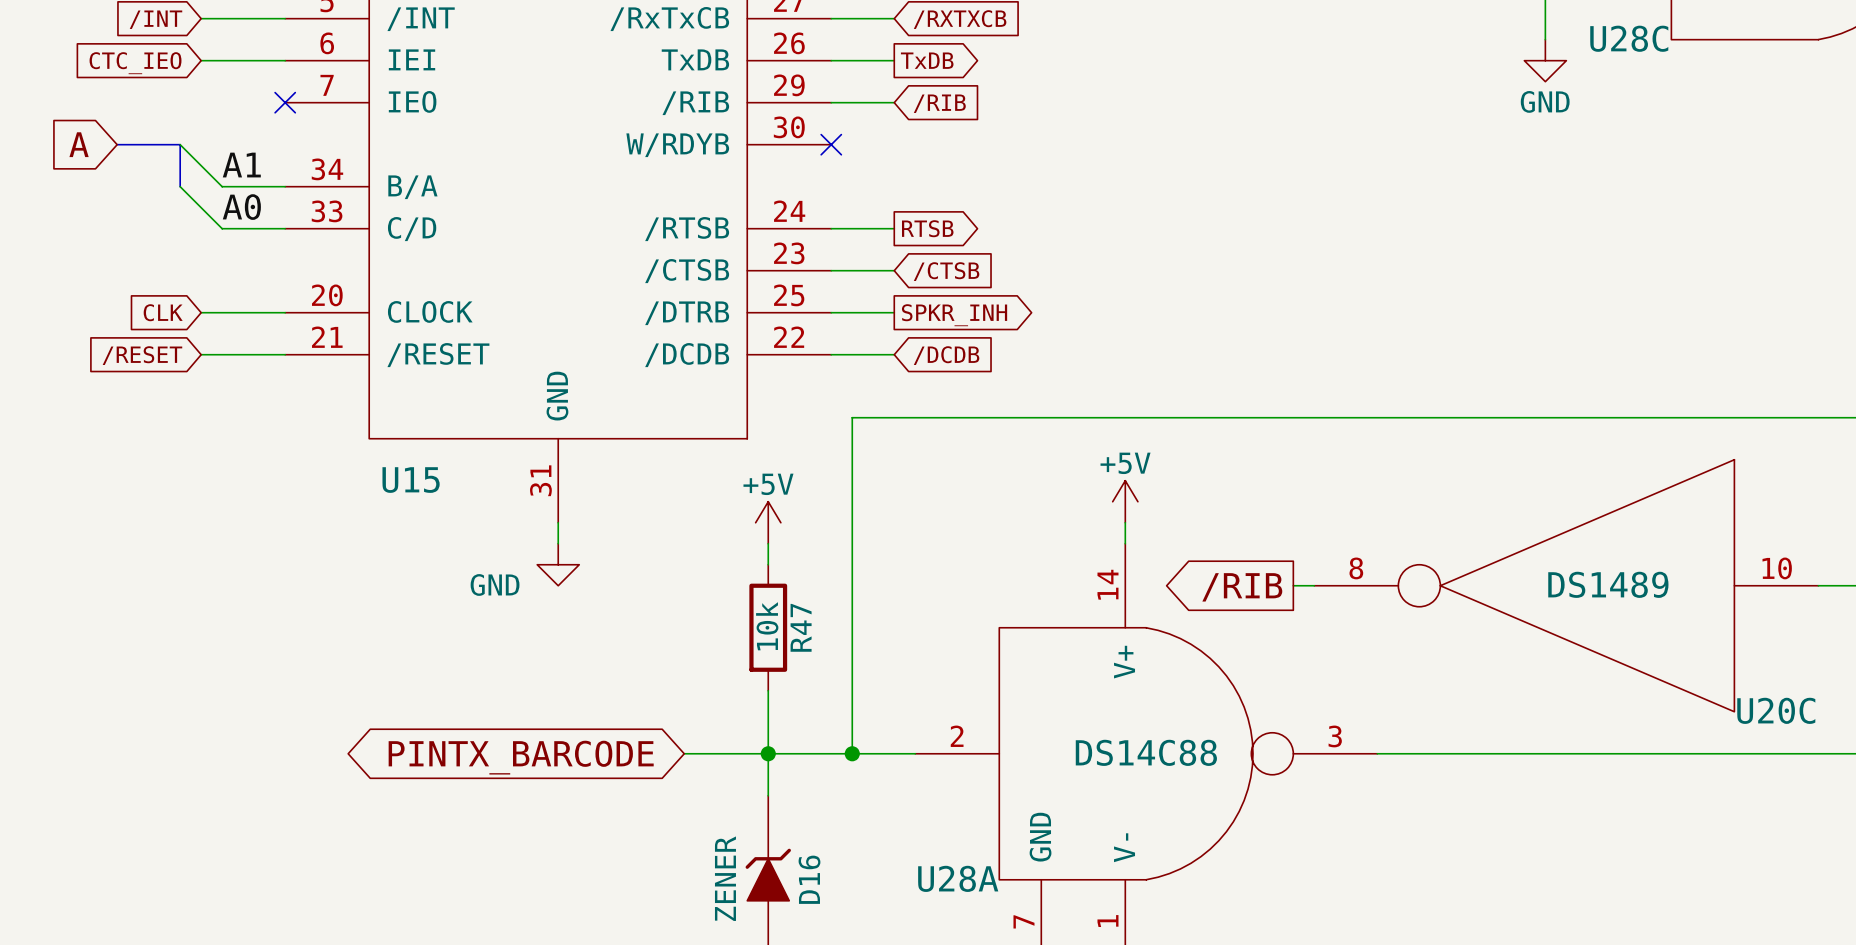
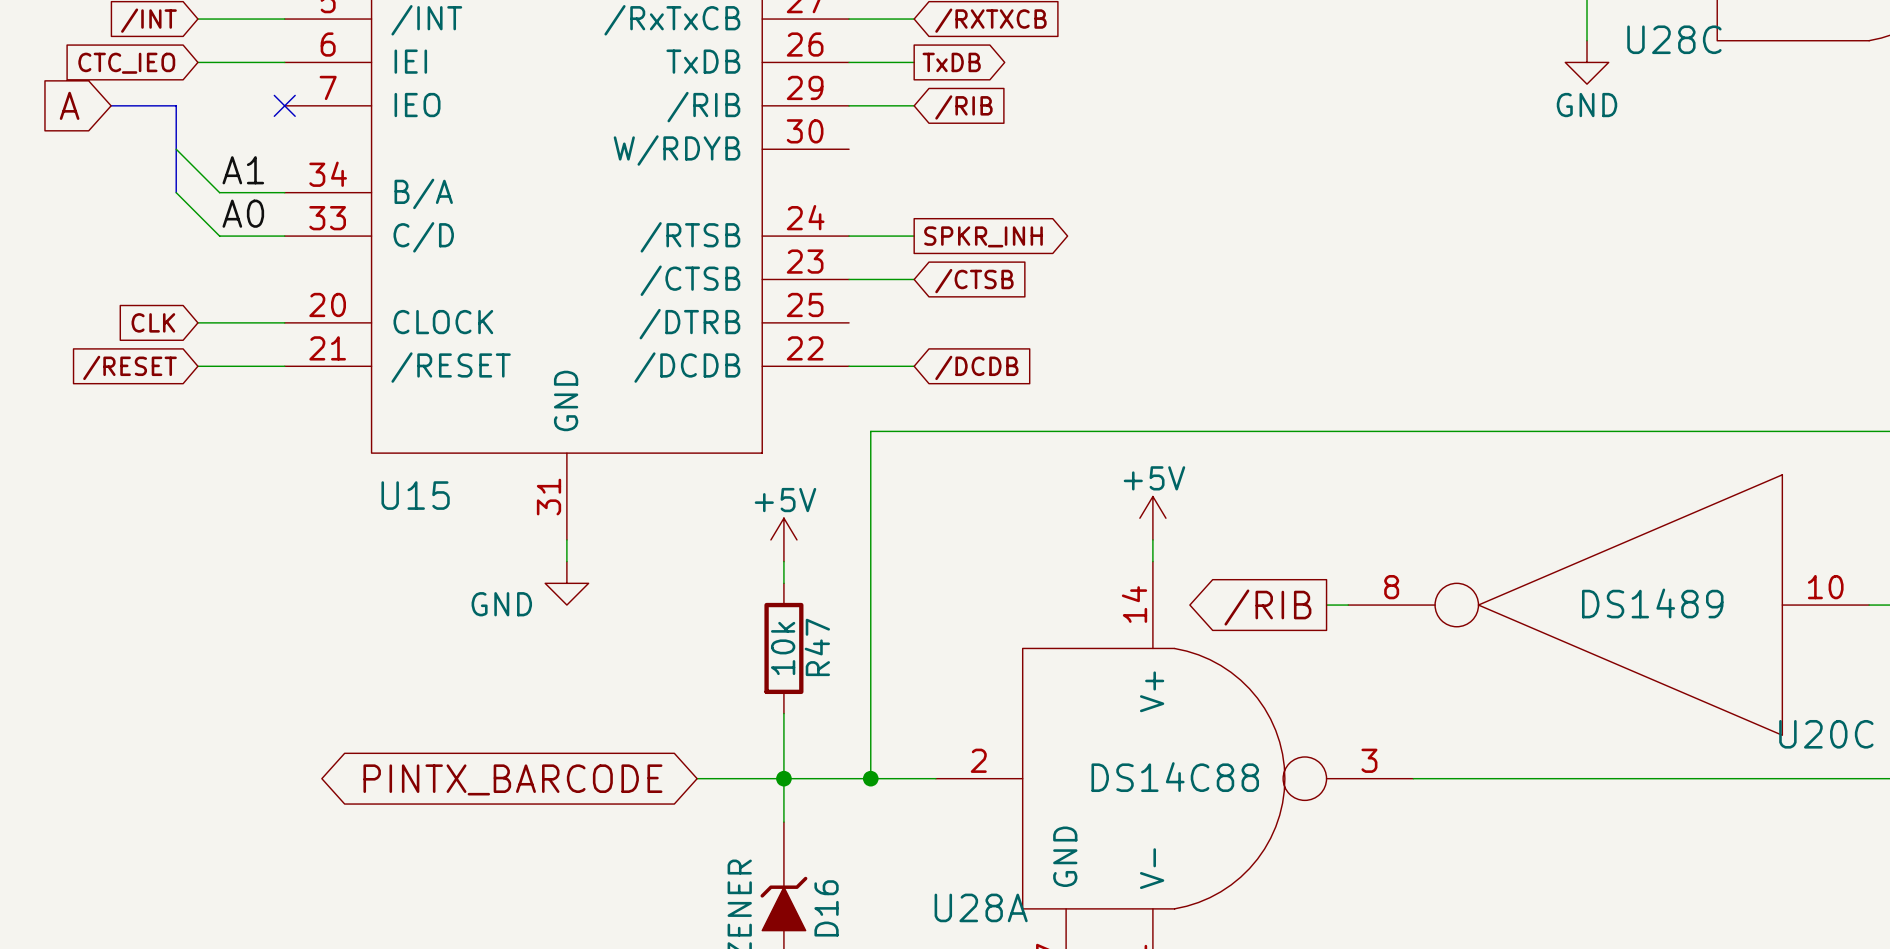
global label position: A (79, 144) -> A (69, 105)
bus: (117, 144) (180, 144) -> (111, 105) (176, 105) (176, 149)
no-connect mark: (831, 144) -> none
global label: RTSB (927, 228) -> SPKR_INH (983, 236)
wire: (831, 312) (894, 312) -> none
global label: SPKR_INH (954, 315) -> none

